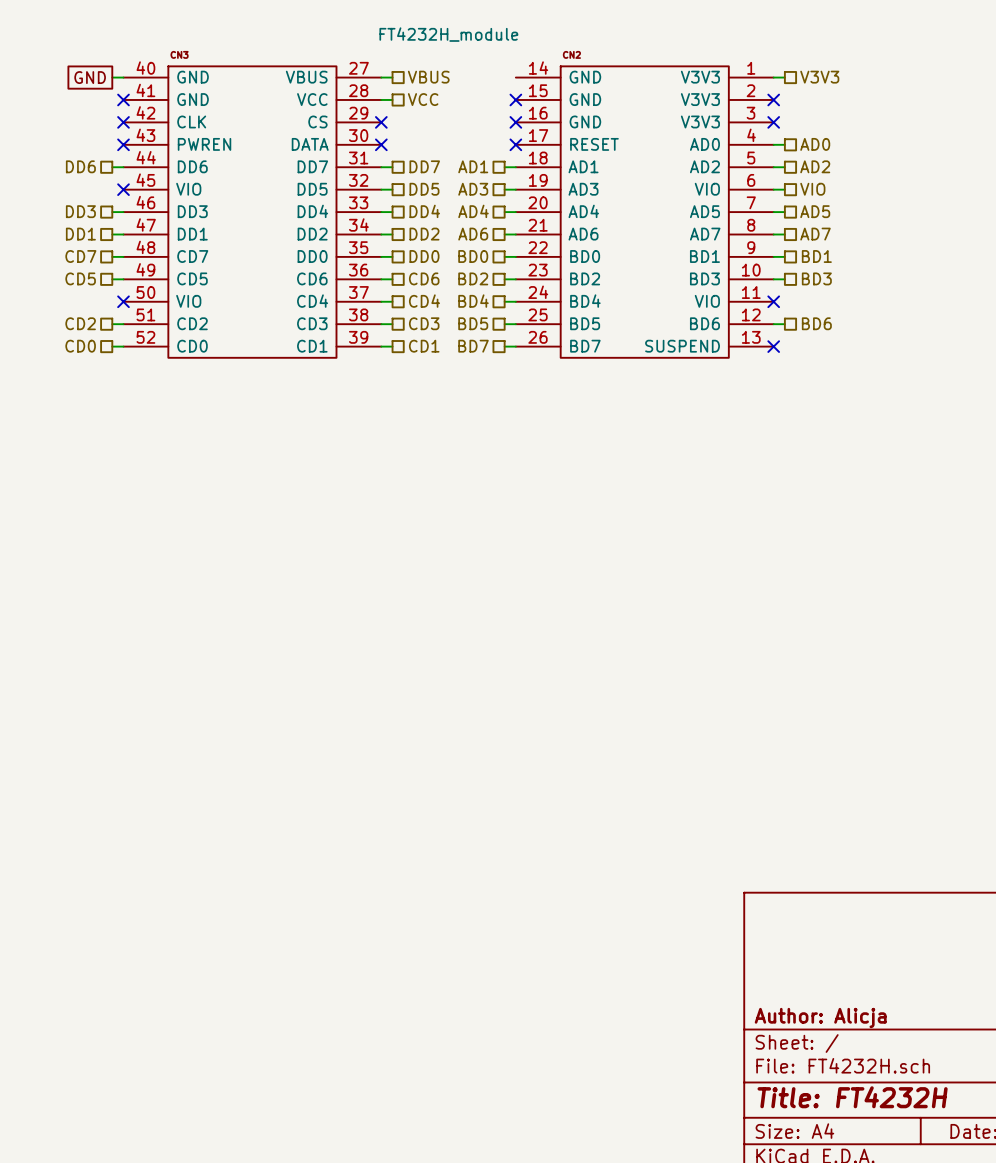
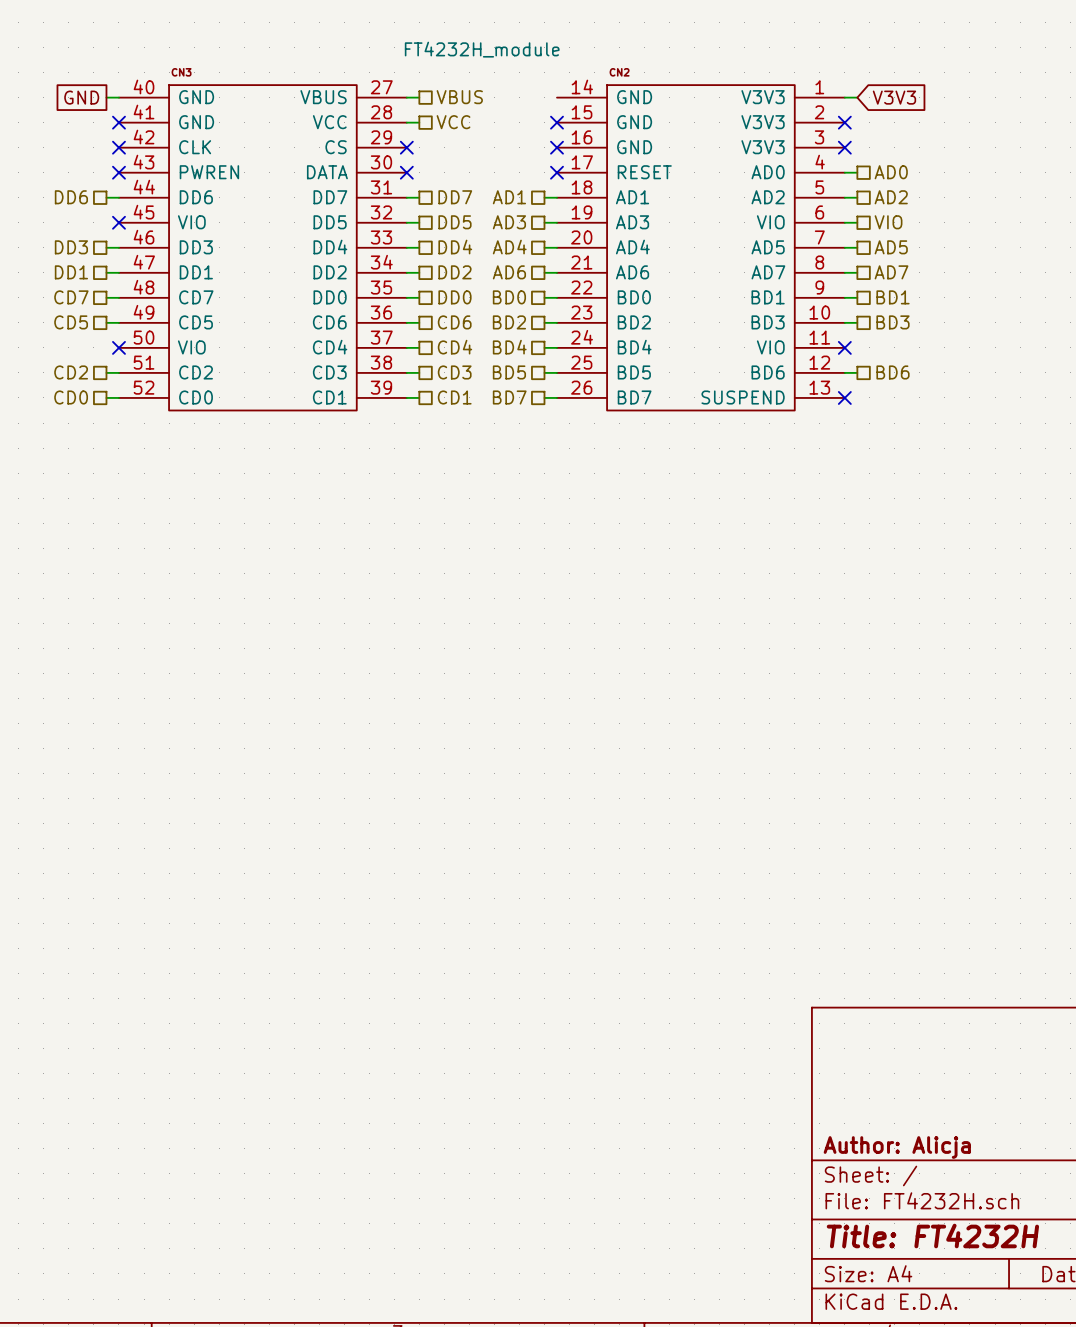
global label: none -> V3V3 (894, 97)
hierarchical label: V3V3 (819, 77) -> none

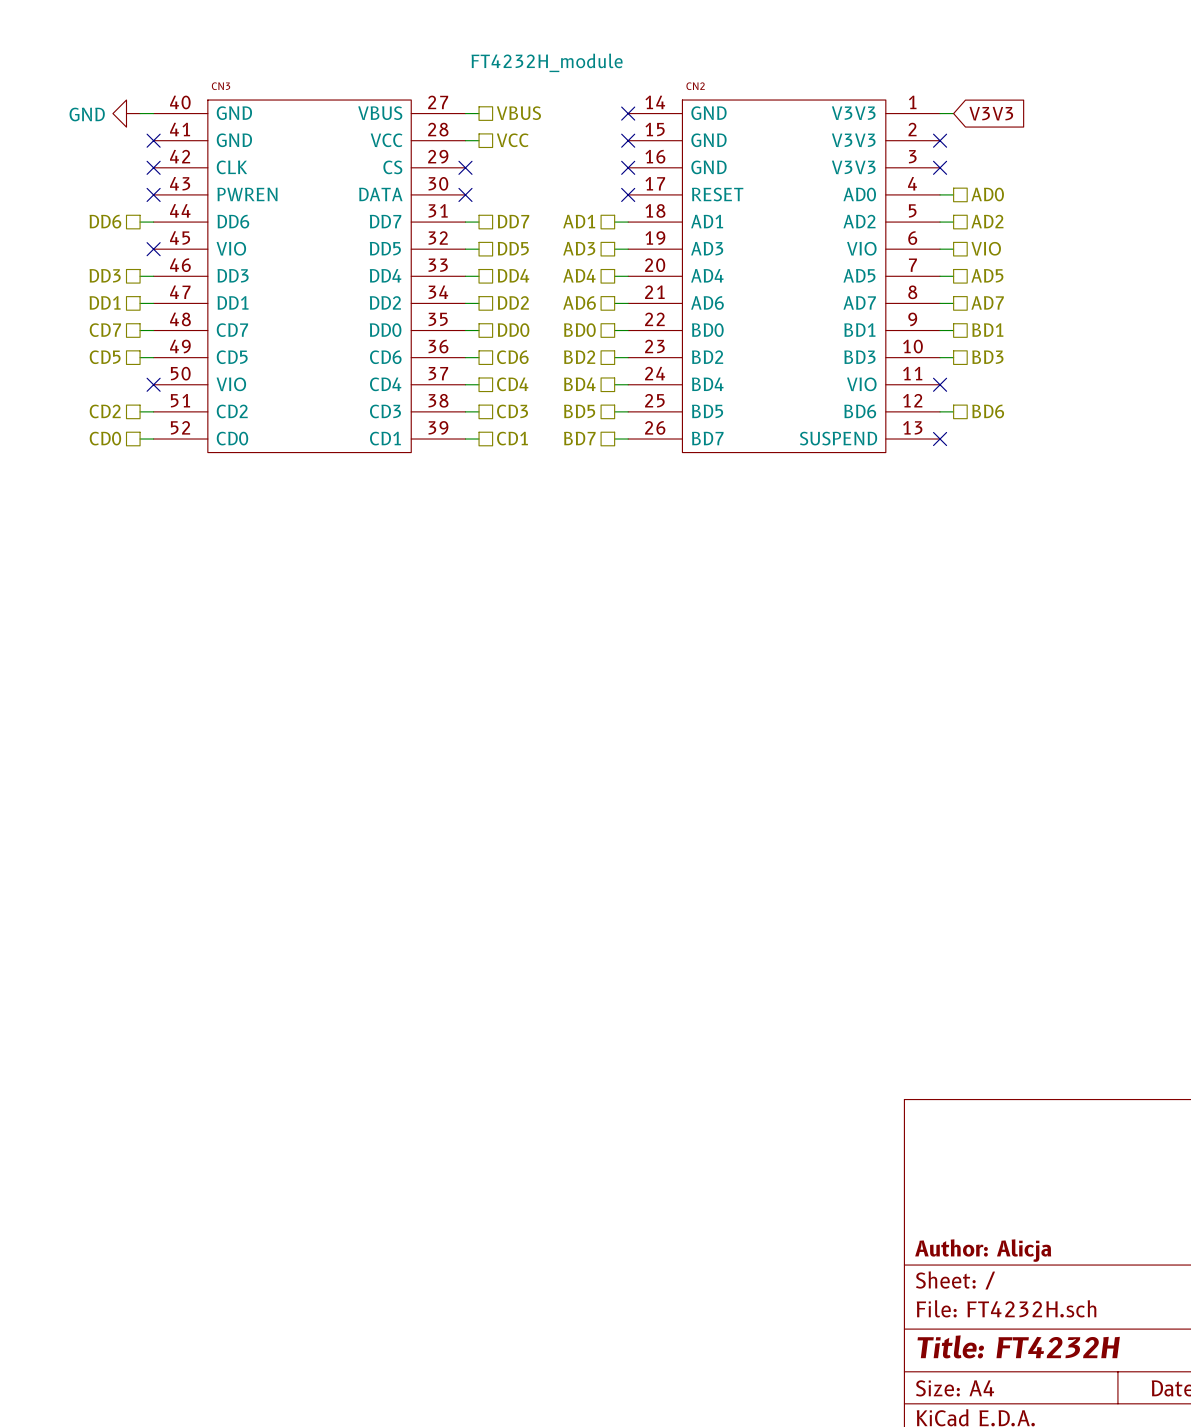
global label: GND (81, 97) -> none
power symbol: none -> GND (126, 113)
no-connect mark: none -> (628, 113)

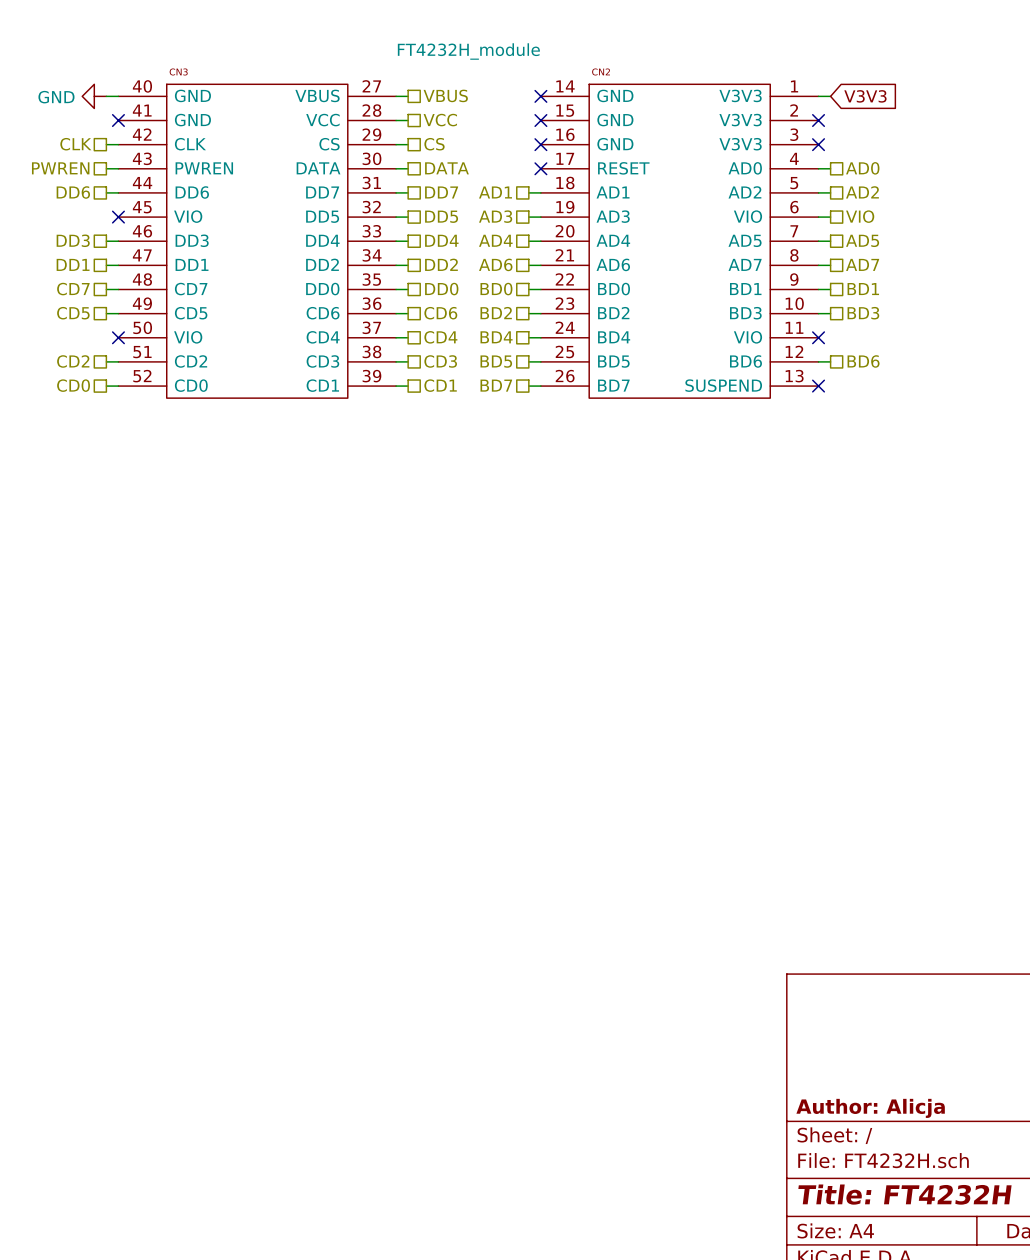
hierarchical label: none -> CLK (75, 144)
wire: none -> (106, 144) (118, 144)
no-connect mark: (153, 167) -> none
wire: none -> (396, 144) (408, 144)
no-connect mark: (465, 167) -> none
hierarchical label: none -> CS (434, 144)
hierarchical label: none -> PWREN (60, 168)
wire: none -> (106, 168) (118, 168)
no-connect mark: (153, 194) -> none
wire: none -> (396, 168) (408, 168)
no-connect mark: (465, 194) -> none
hierarchical label: none -> DATA (446, 168)

